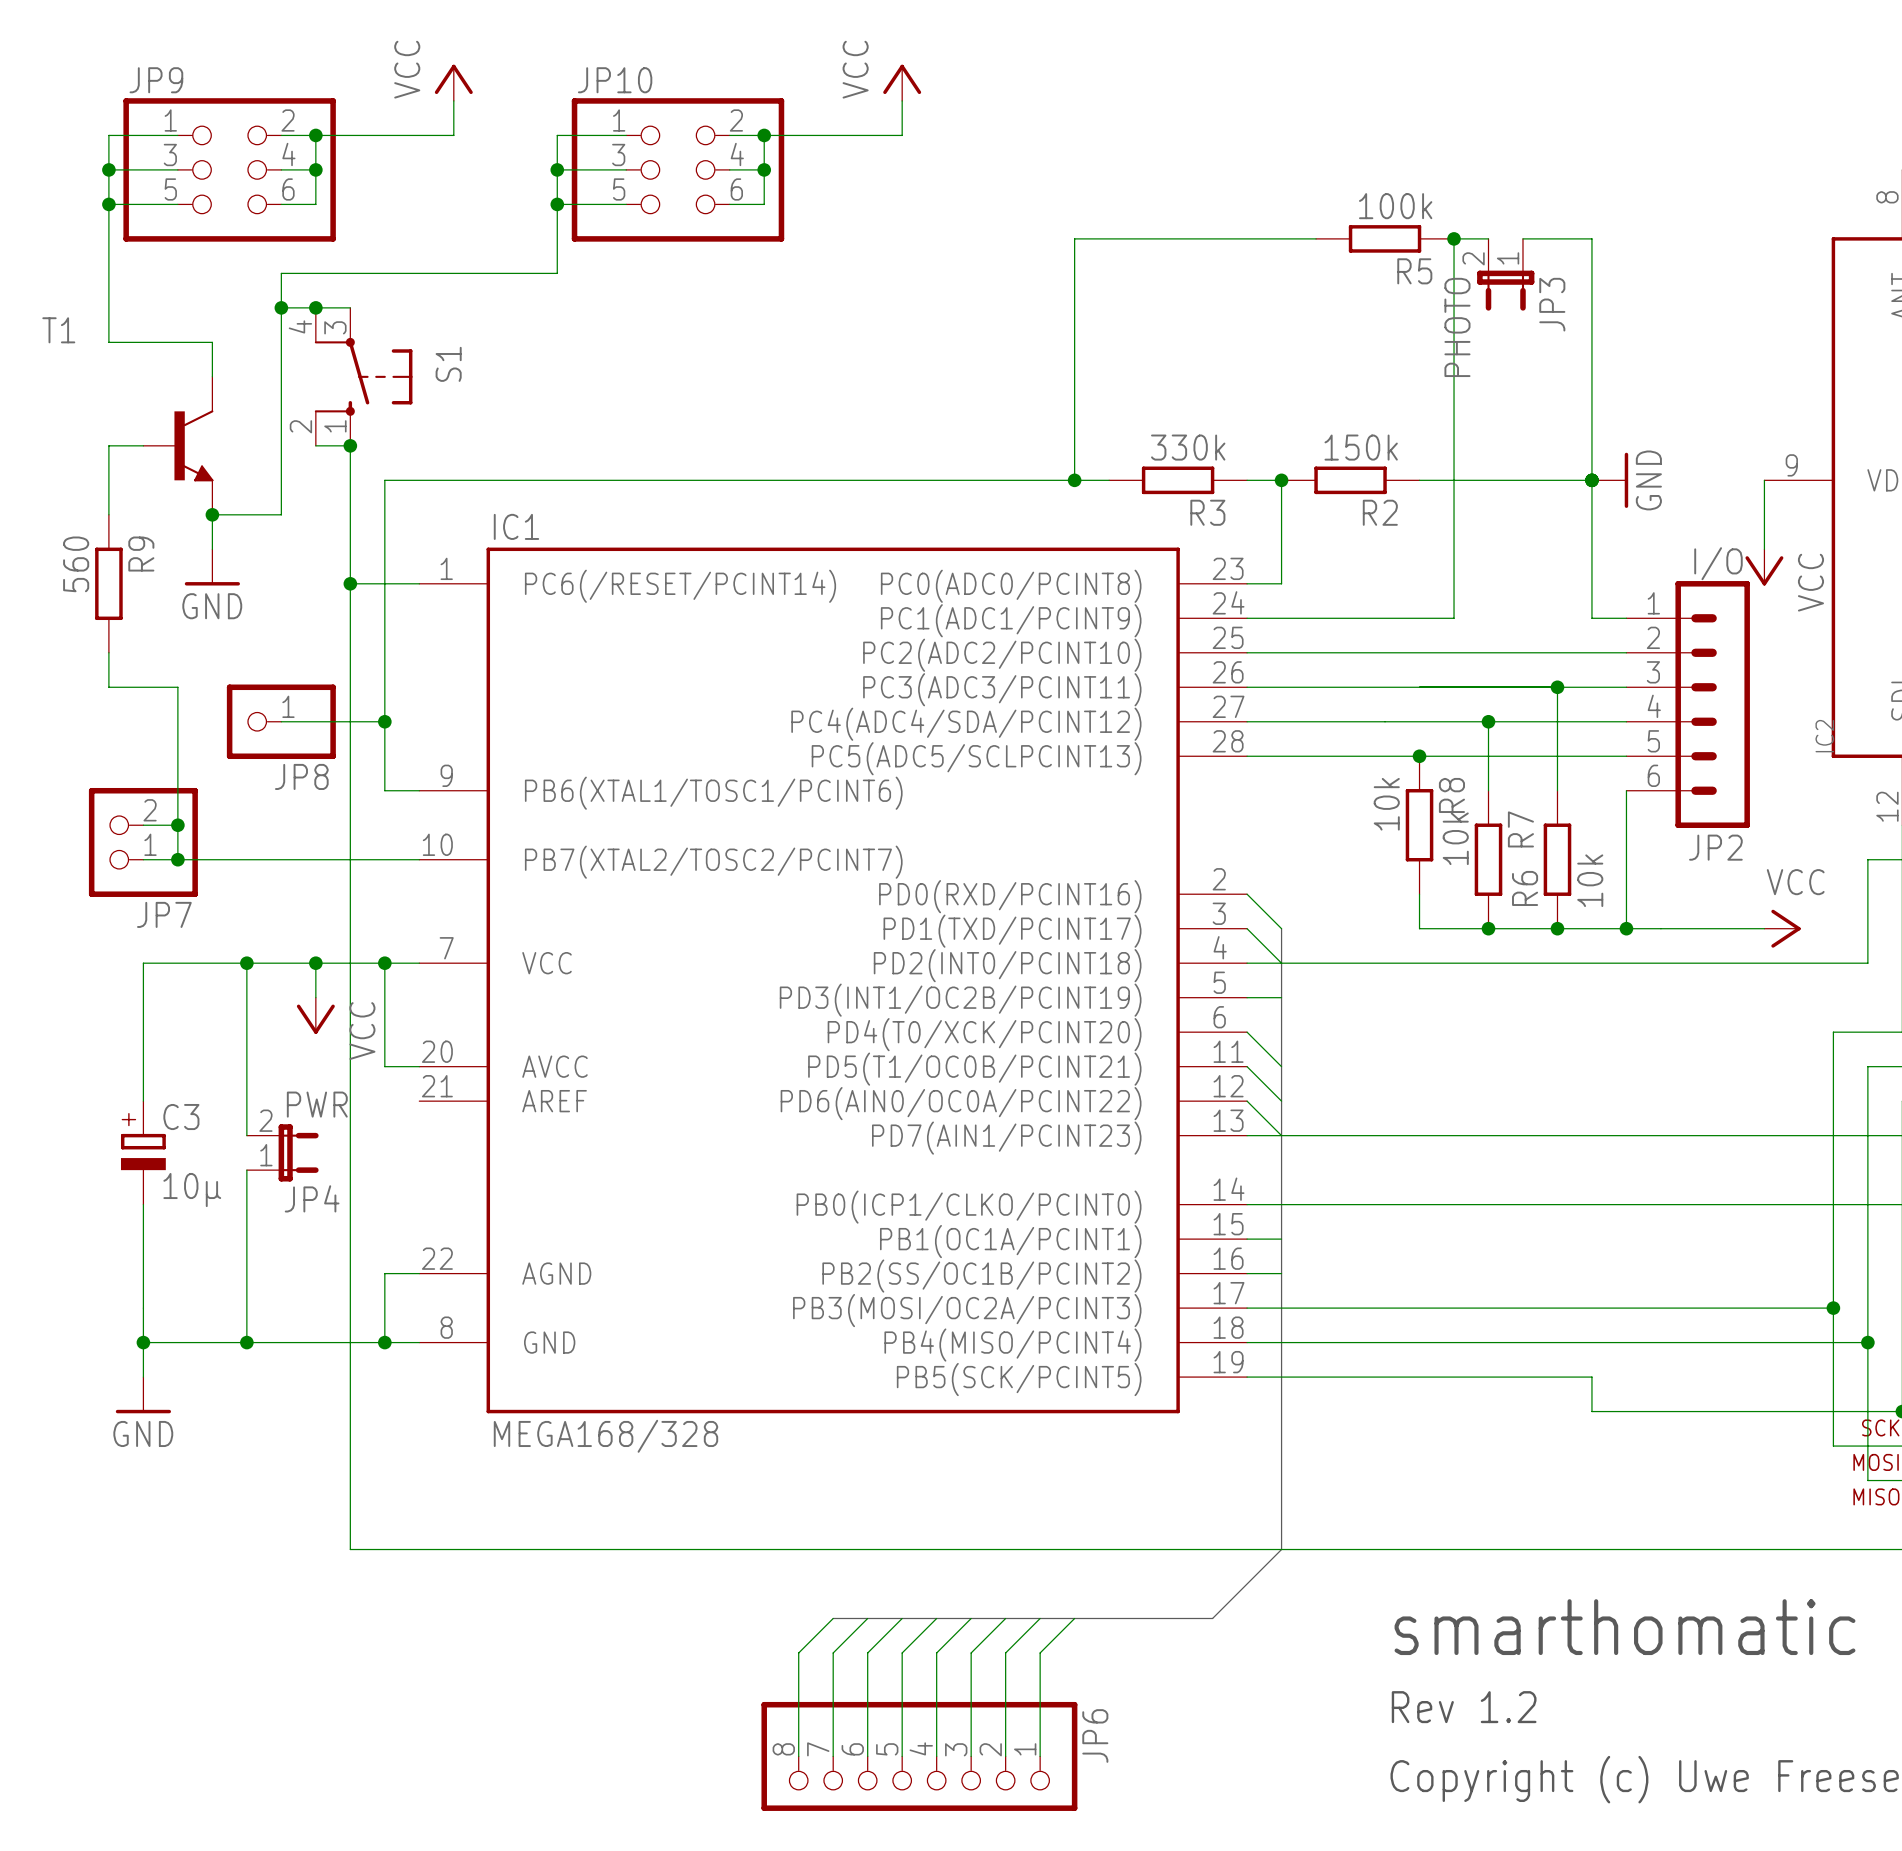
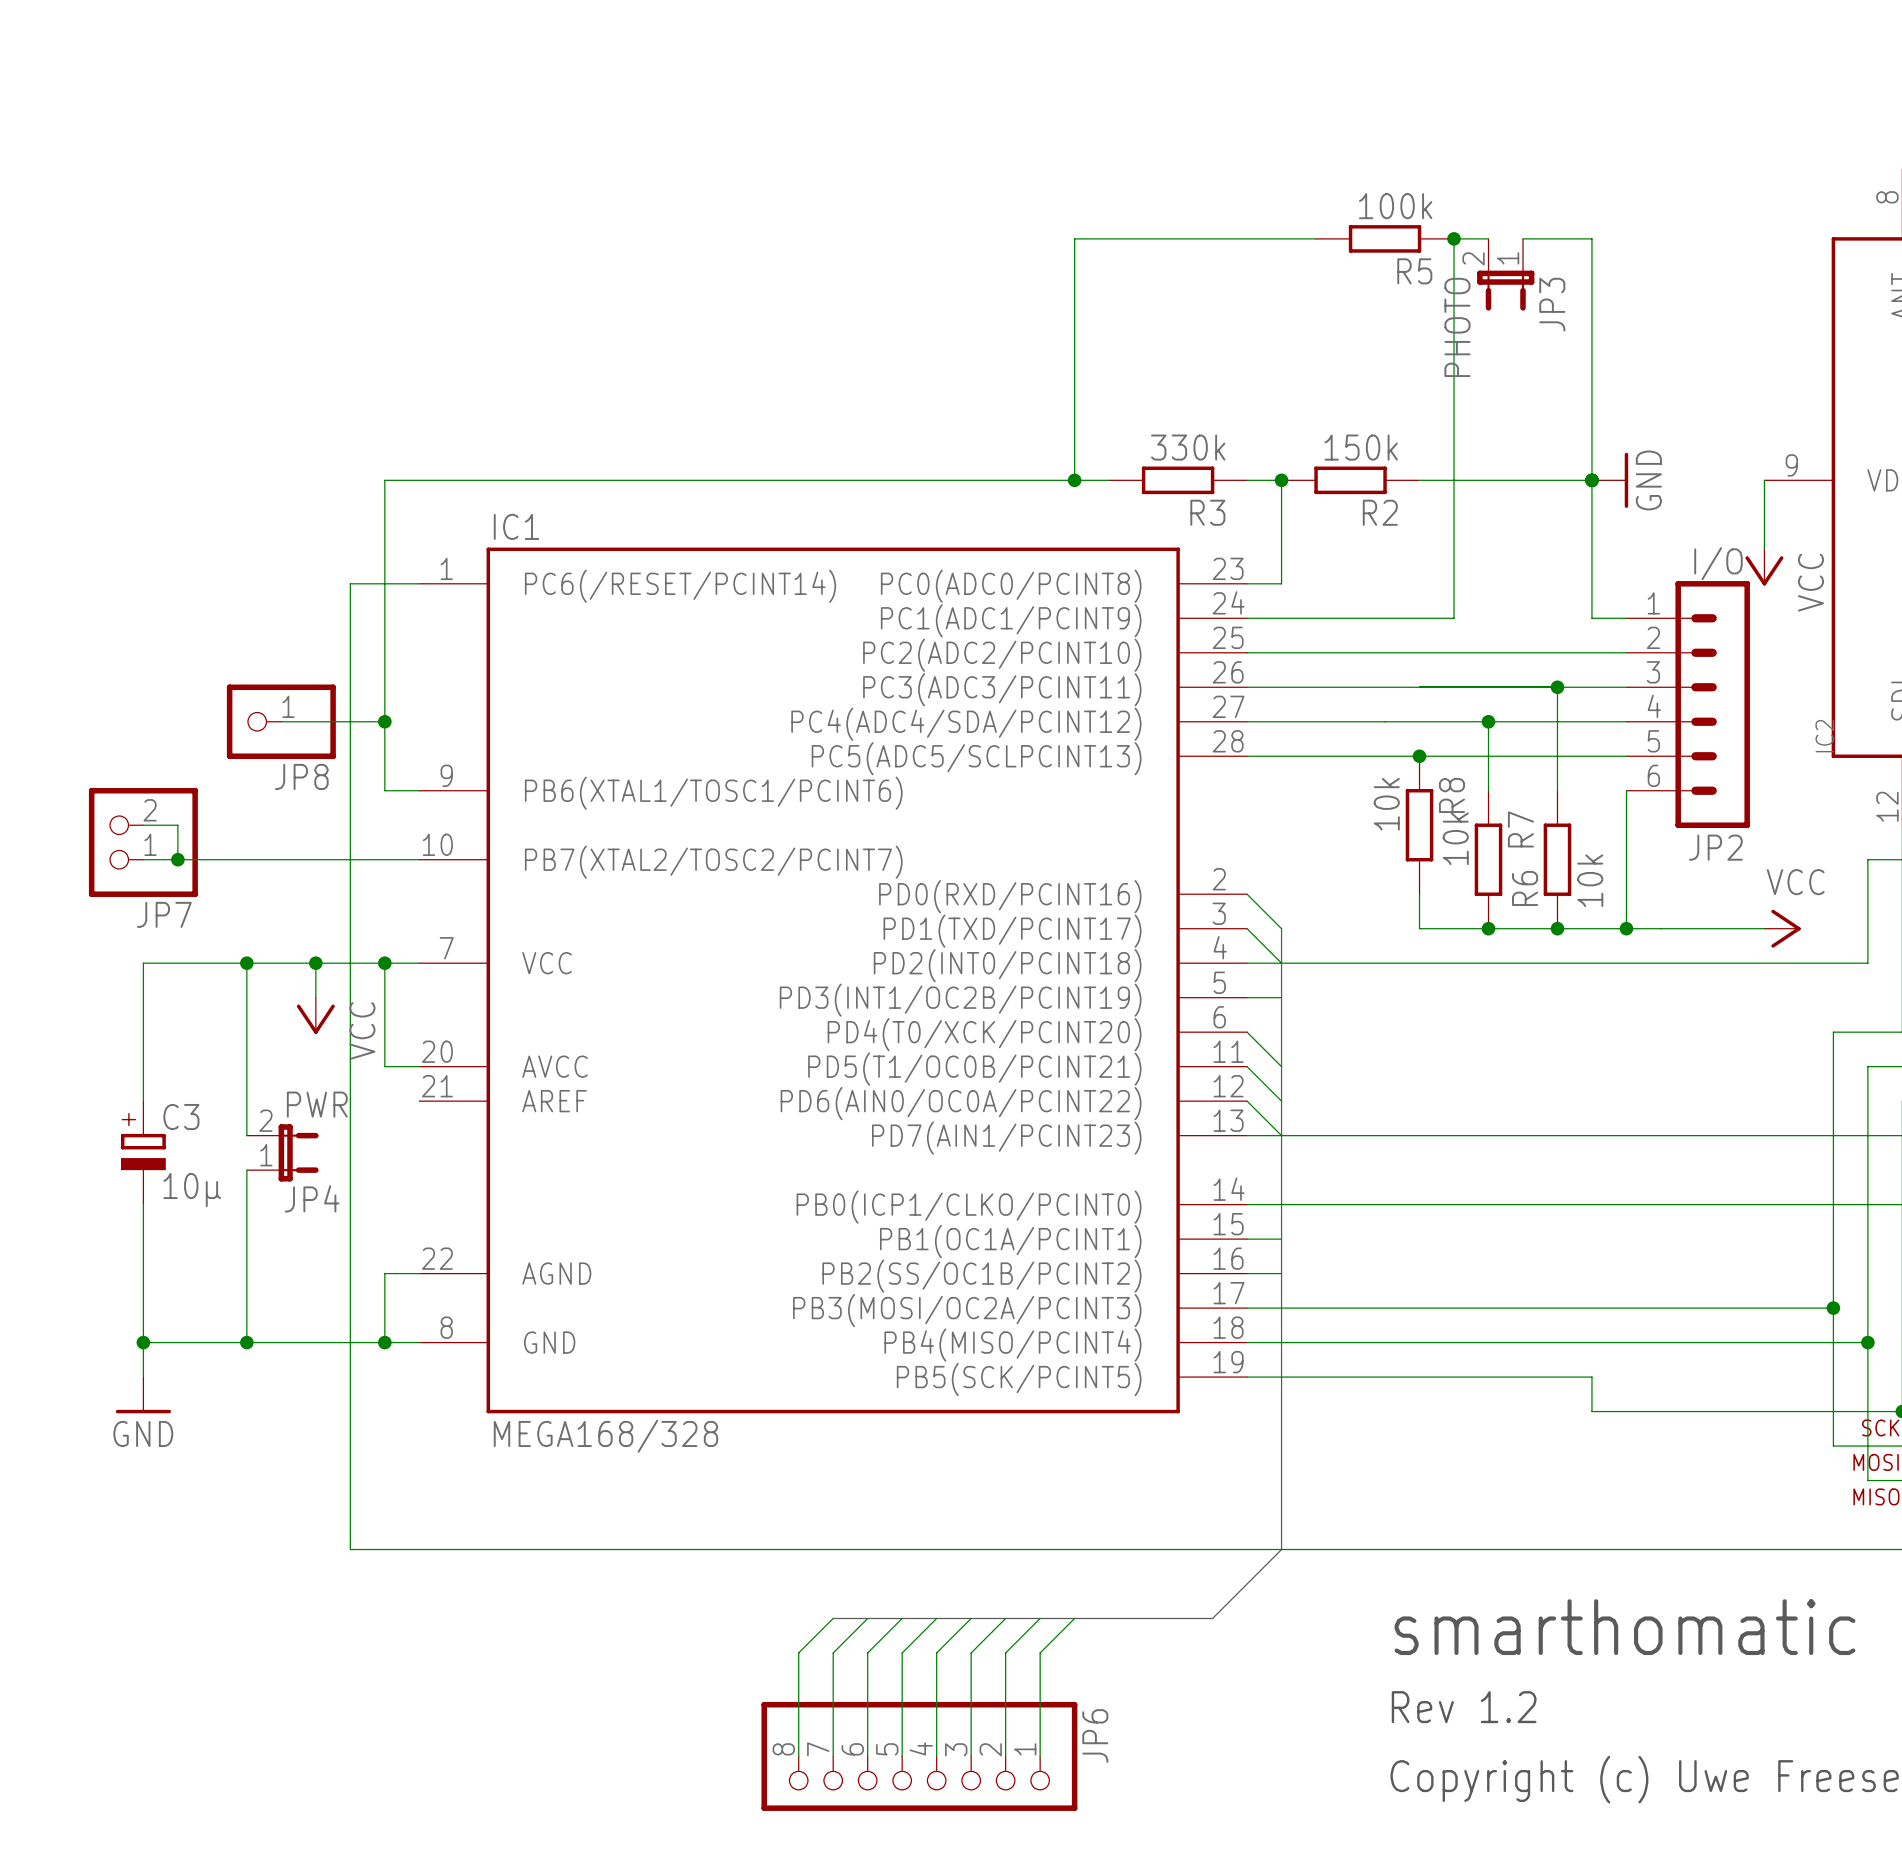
power symbol: VCC (453, 82) -> none
power symbol: VCC (902, 82) -> none
wire: (453, 100) (453, 135) (281, 135) -> none
wire: (902, 100) (902, 135) (729, 135) -> none
wire: (177, 135) (108, 135) (108, 342) (212, 342) (212, 376) -> none
wire: (315, 135) (315, 204) (281, 204) -> none
junction: (315, 135) -> none
wire: (626, 135) (557, 135) (557, 273) (281, 273) (281, 514) (212, 514) (212, 549) -> none
wire: (764, 135) (764, 204) (729, 204) -> none
junction: (764, 135) -> none
wire: (108, 169) (177, 169) -> none
junction: (108, 169) -> none
JP9: (229, 169) -> none
wire: (281, 169) (315, 169) -> none
junction: (315, 169) -> none
wire: (557, 169) (626, 169) -> none
junction: (557, 169) -> none
JP10: (677, 169) -> none
wire: (729, 169) (764, 169) -> none
junction: (764, 169) -> none
wire: (108, 204) (177, 204) -> none
junction: (108, 204) -> none
wire: (557, 204) (626, 204) -> none
junction: (557, 204) -> none
wire: (281, 307) (350, 307) -> none
junction: (281, 307) -> none
junction: (315, 307) -> none
S1: (363, 376) -> none
wire: (143, 445) (108, 445) (108, 514) -> none
T1: (178, 445) -> none
wire: (315, 445) (350, 445) (350, 583) -> none
junction: (350, 445) -> none
junction: (212, 514) -> none
power symbol: GND (212, 567) -> none
R9: 560 (108, 583) -> none
junction: (350, 583) -> none
wire: (108, 652) (108, 687) (177, 687) (177, 825) -> none
junction: (177, 825) -> none

